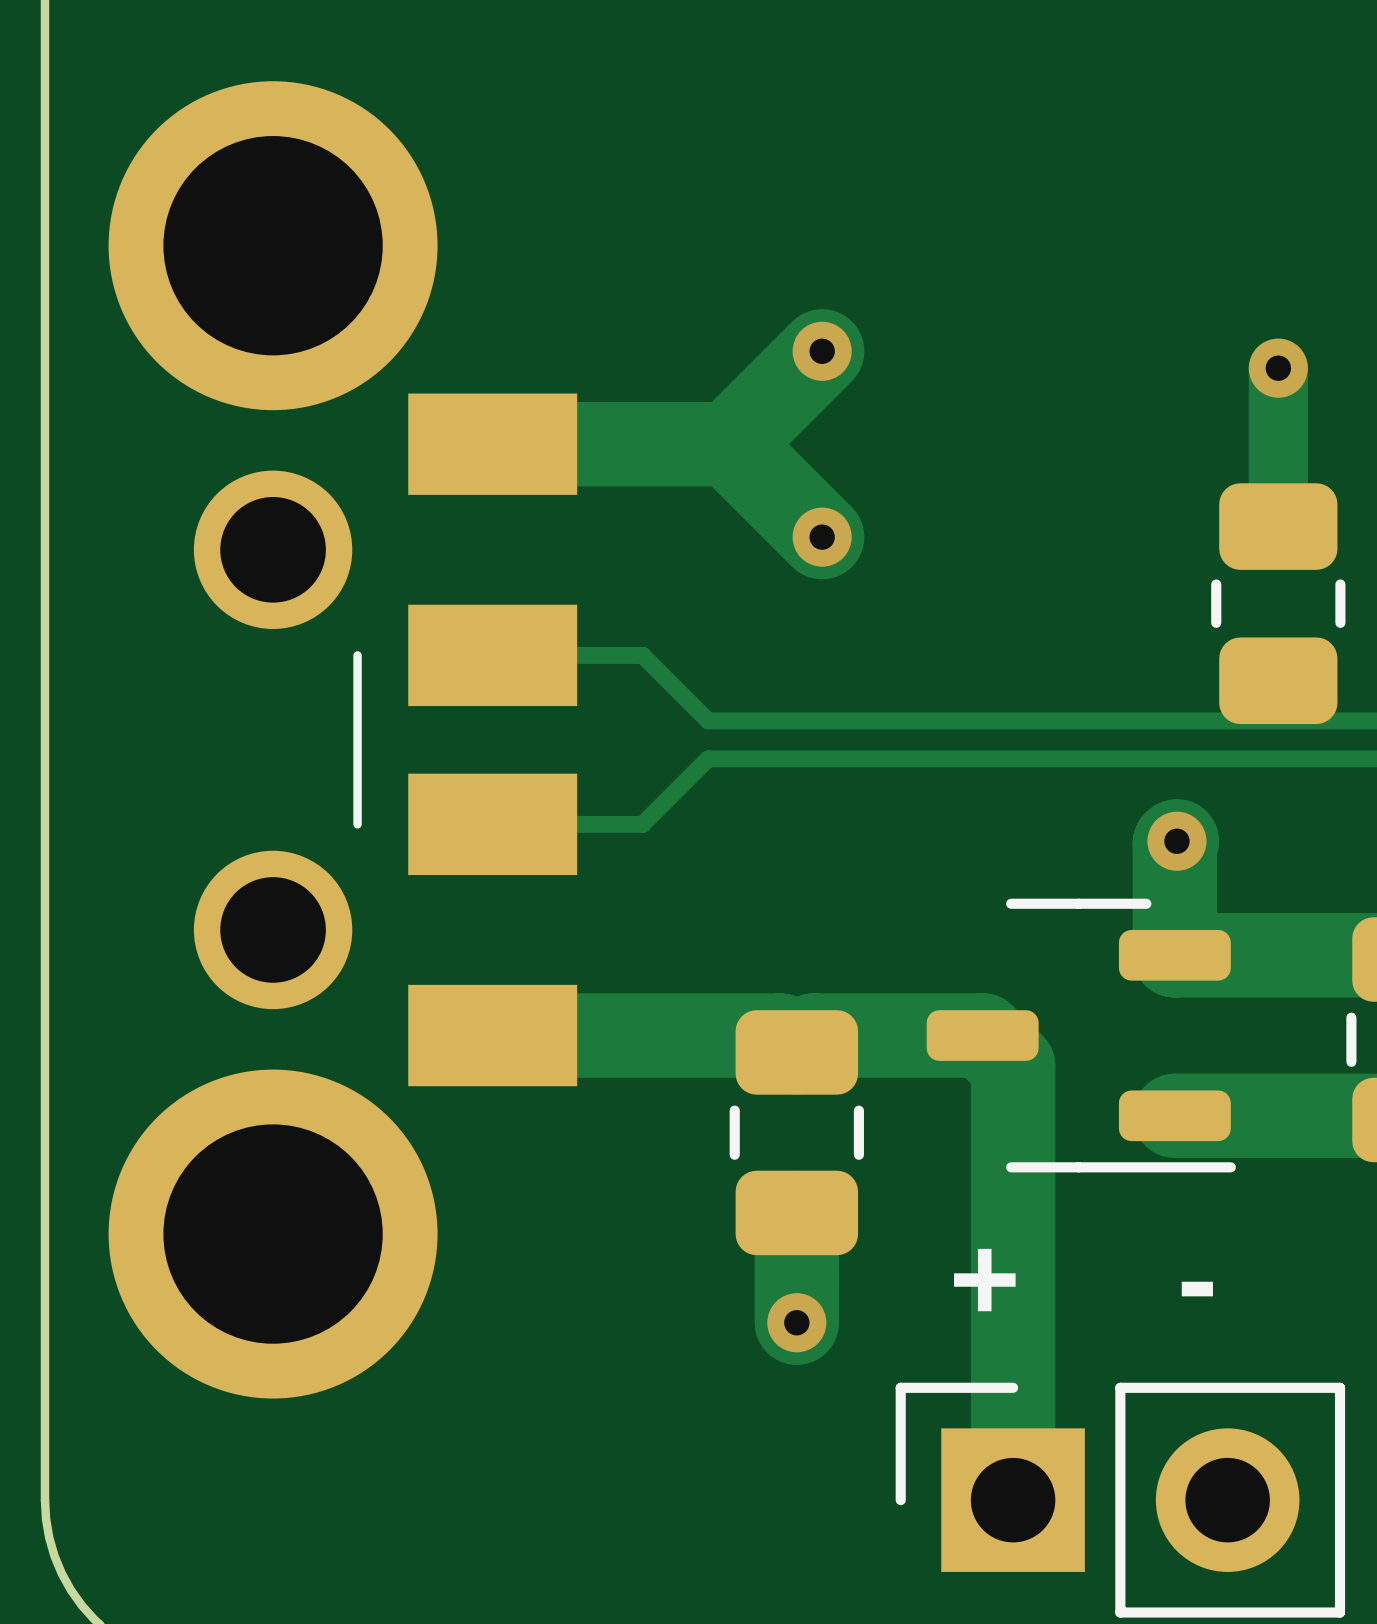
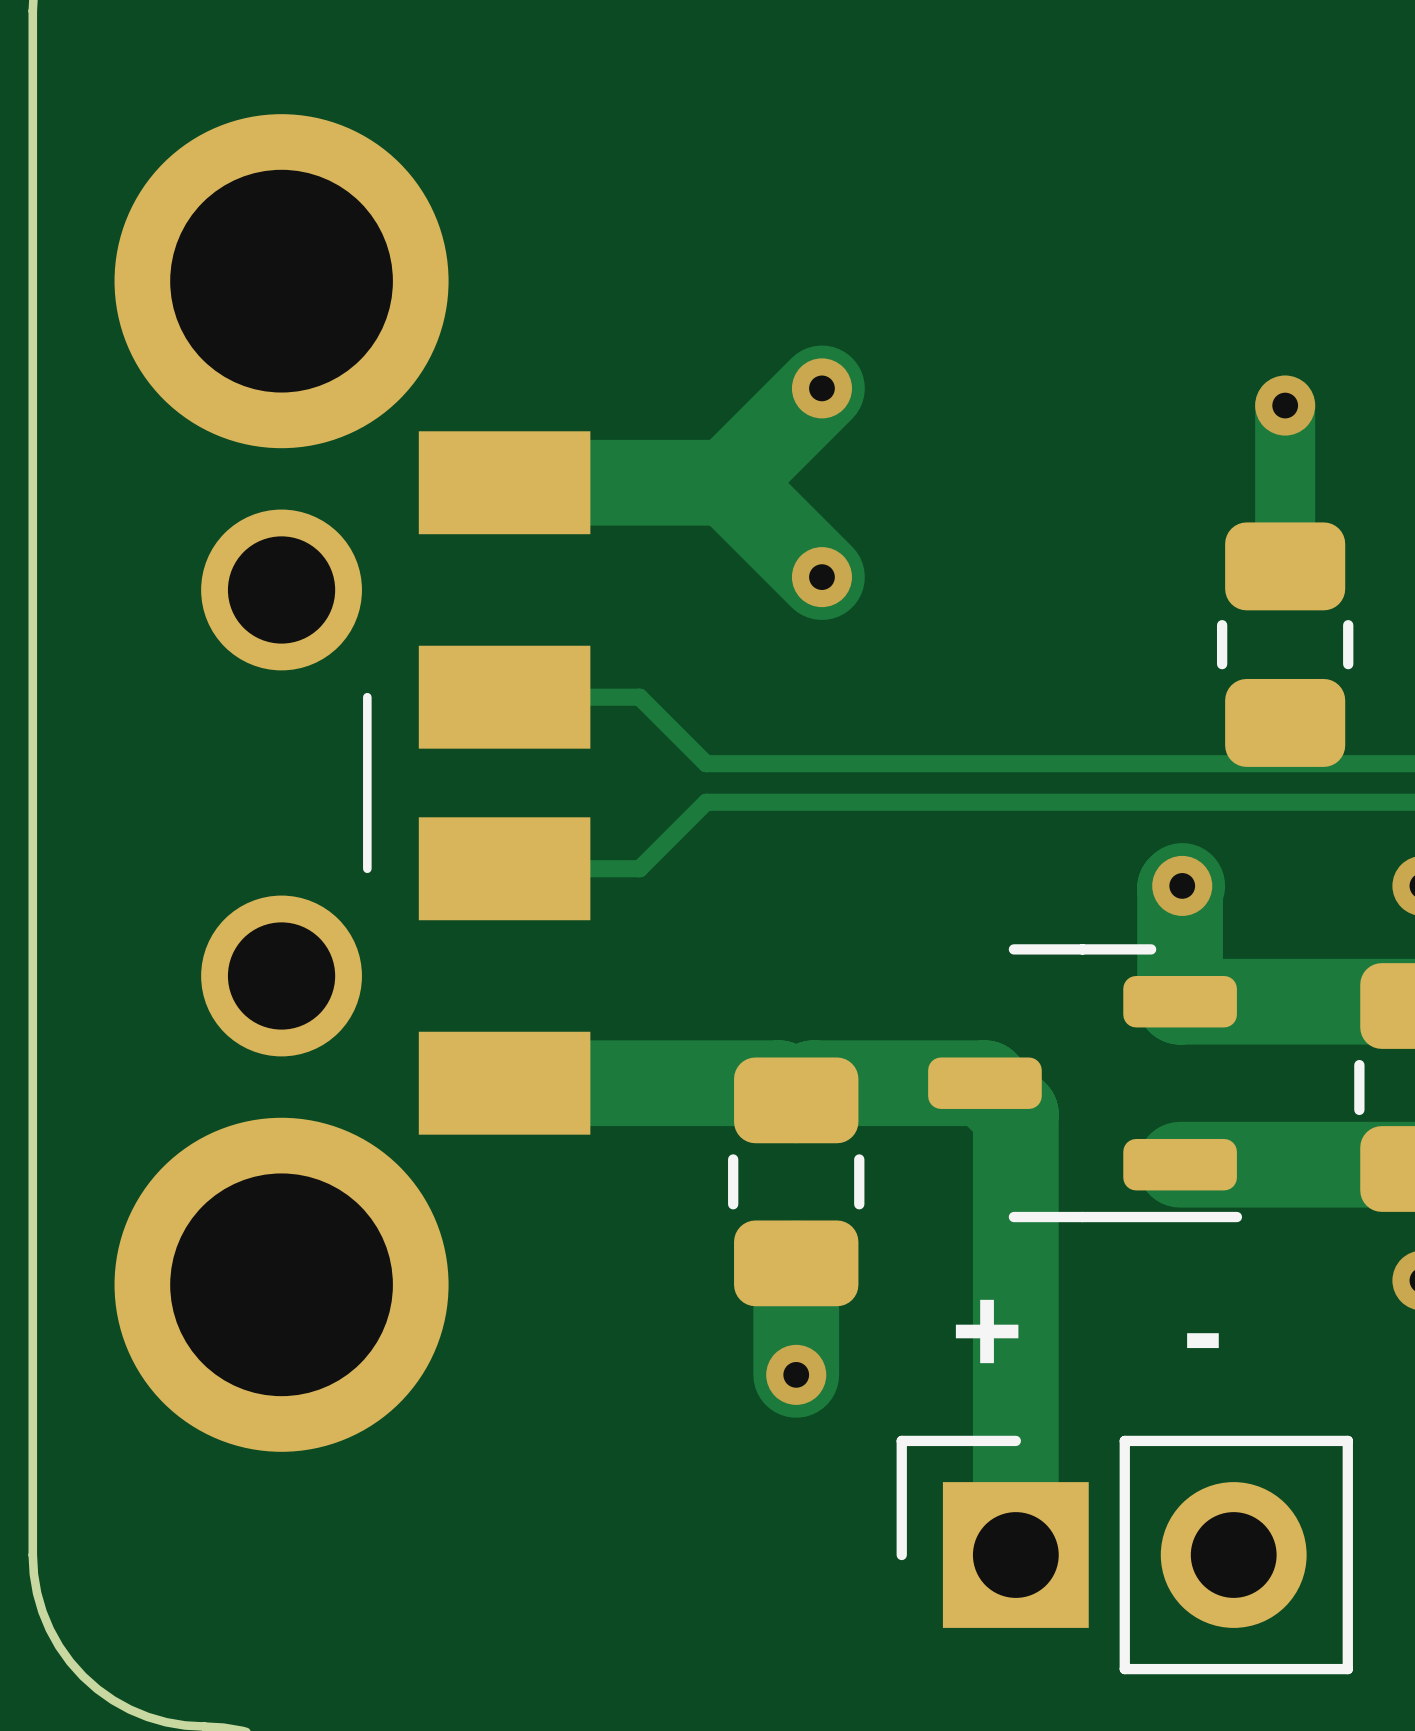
part position: (342, 739) -> (352, 782)

